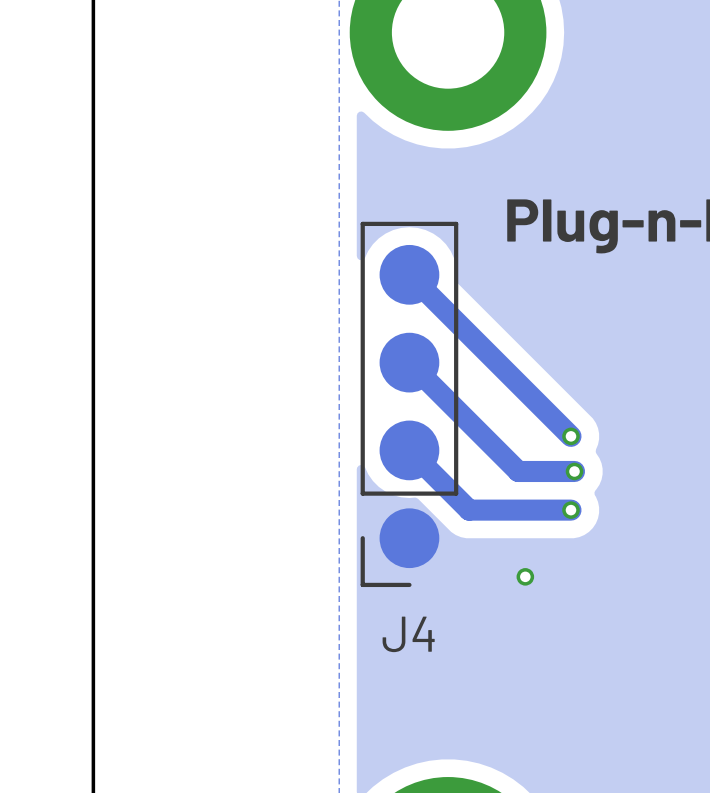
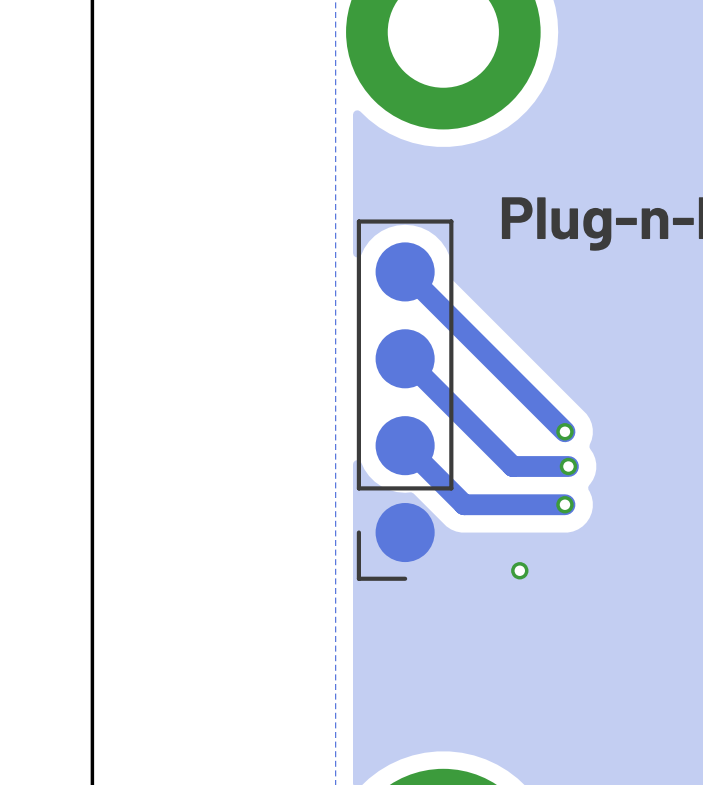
J4 name: J4 (408, 634) -> none

